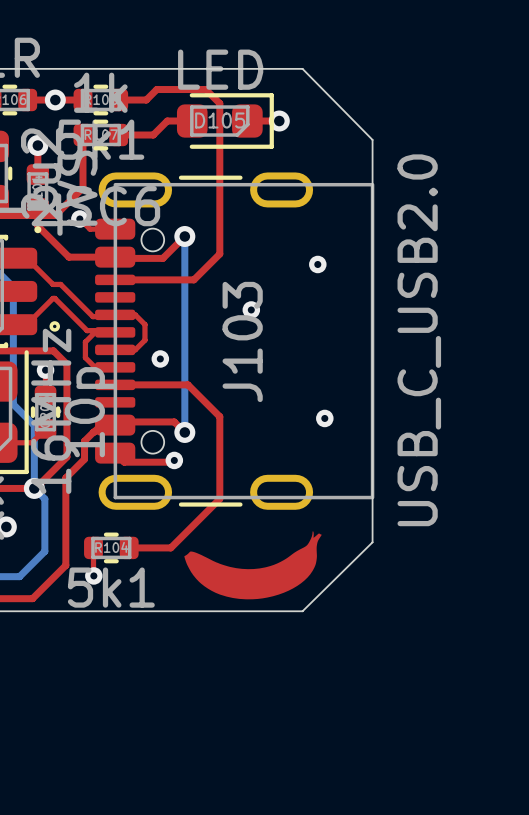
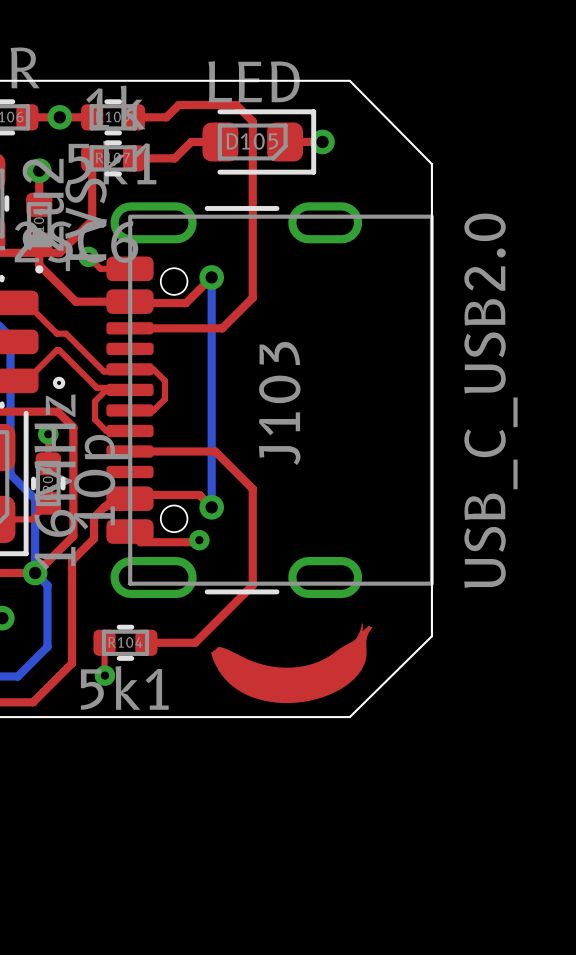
via: (317, 264) -> none
via: (251, 309) -> none
via: (160, 358) -> none
via: (324, 418) -> none

